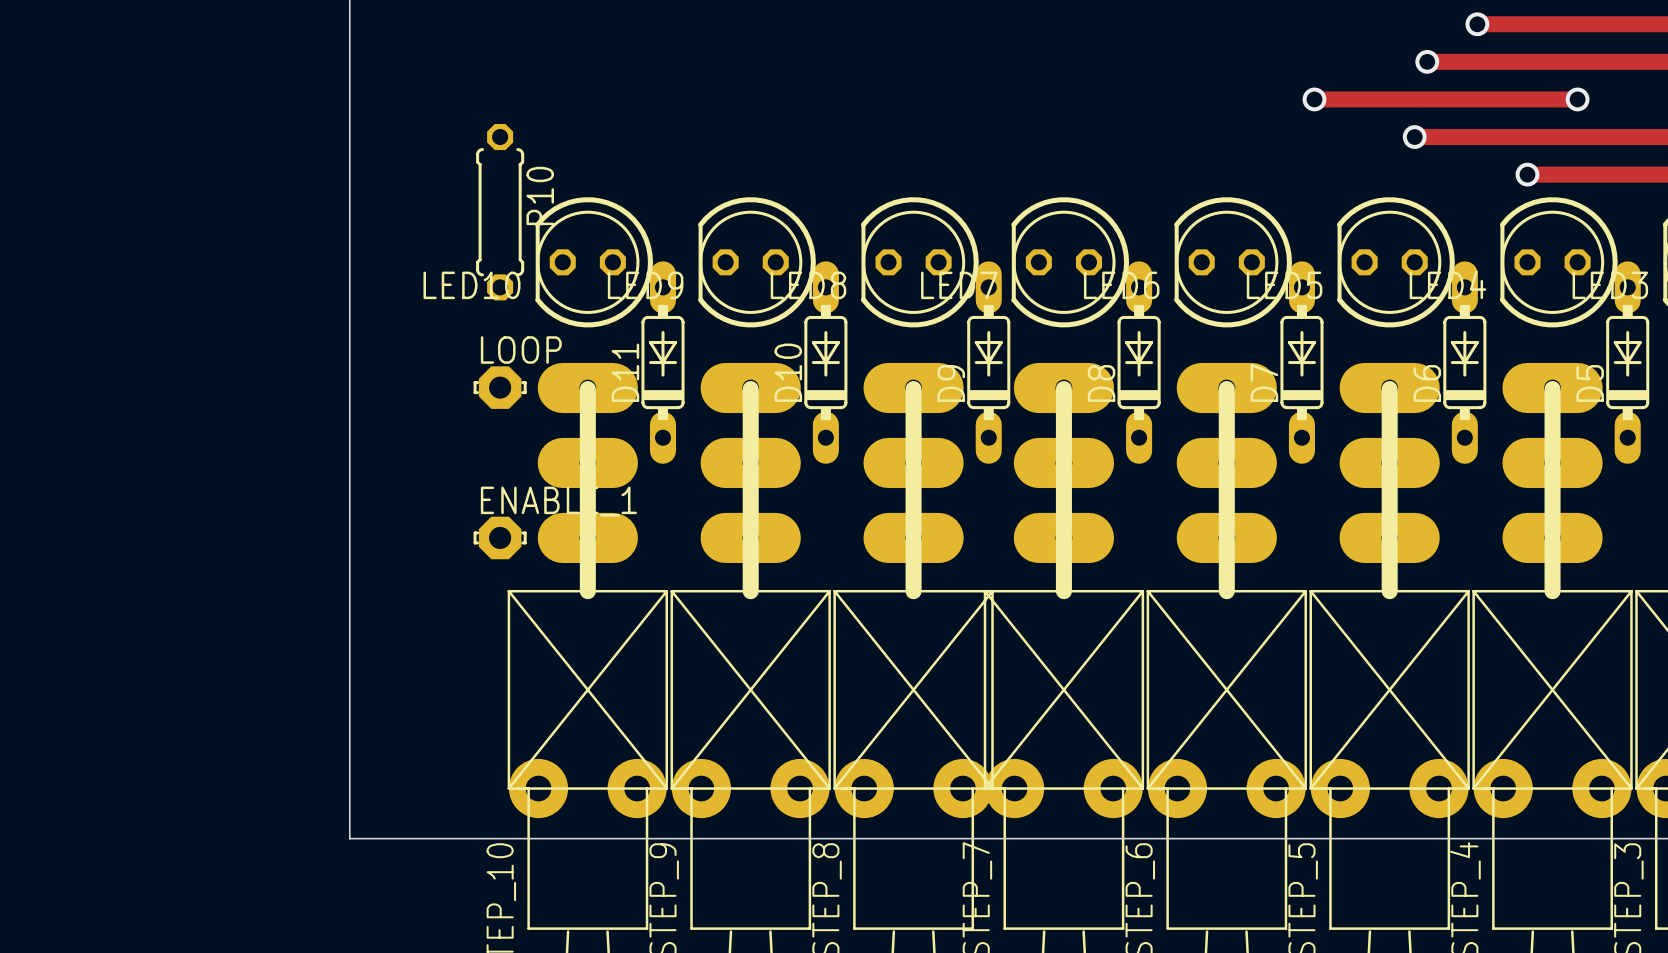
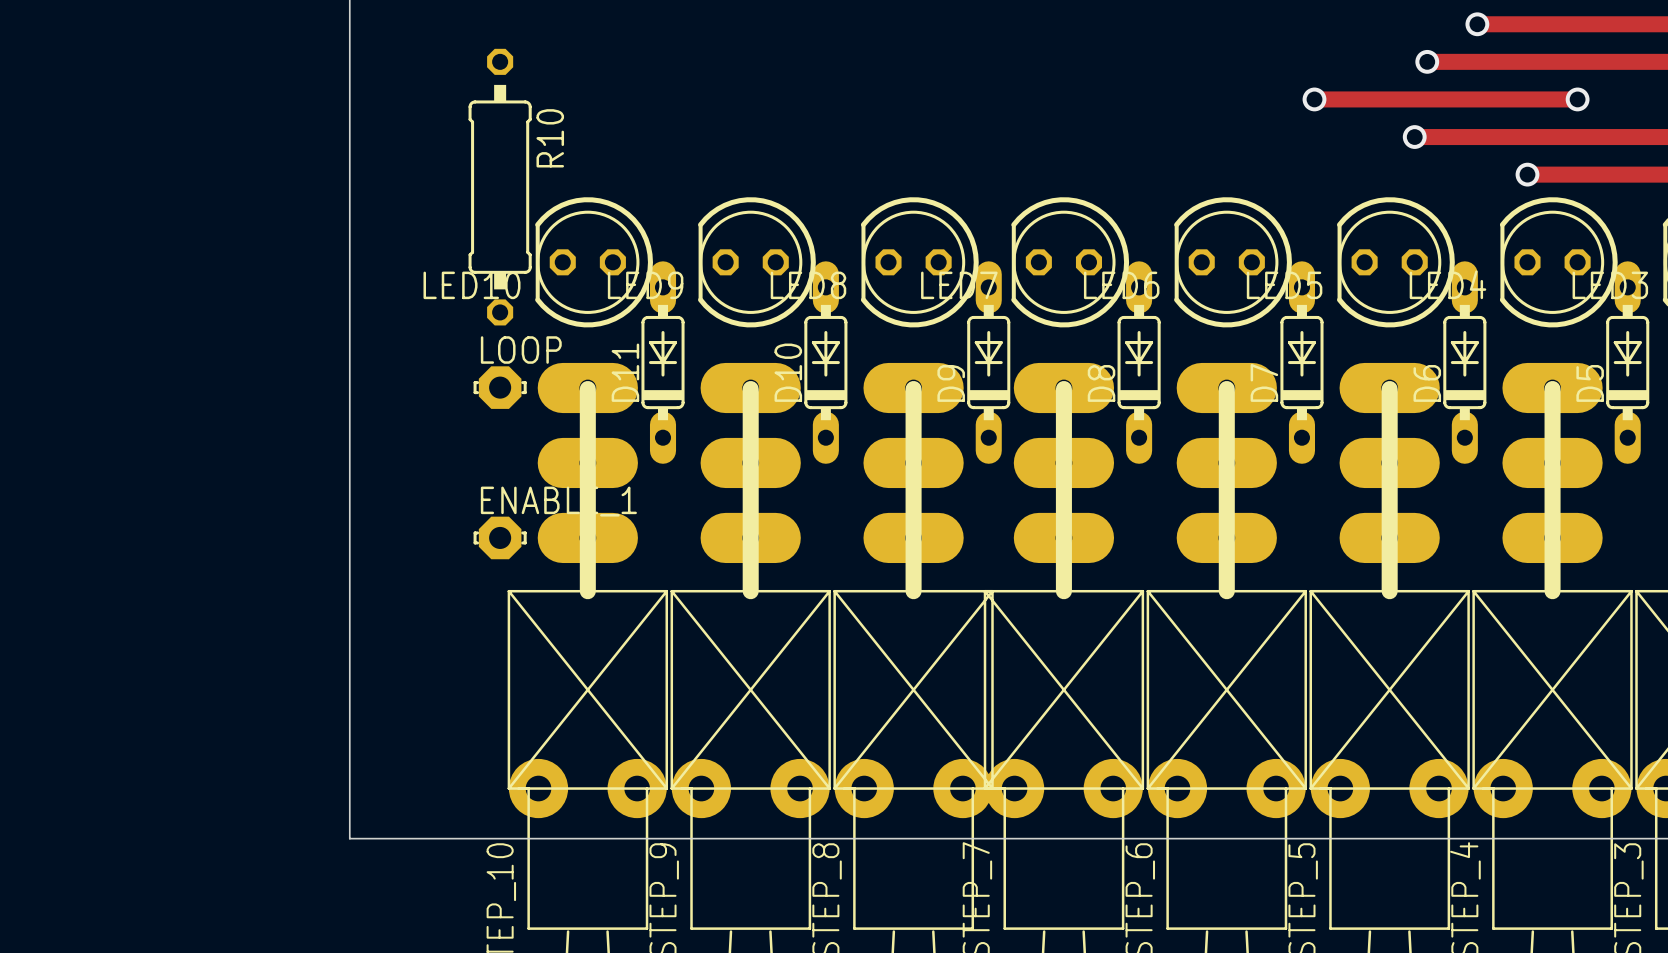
R10 footprint: [476, 124, 525, 301] -> [468, 48, 532, 326]

